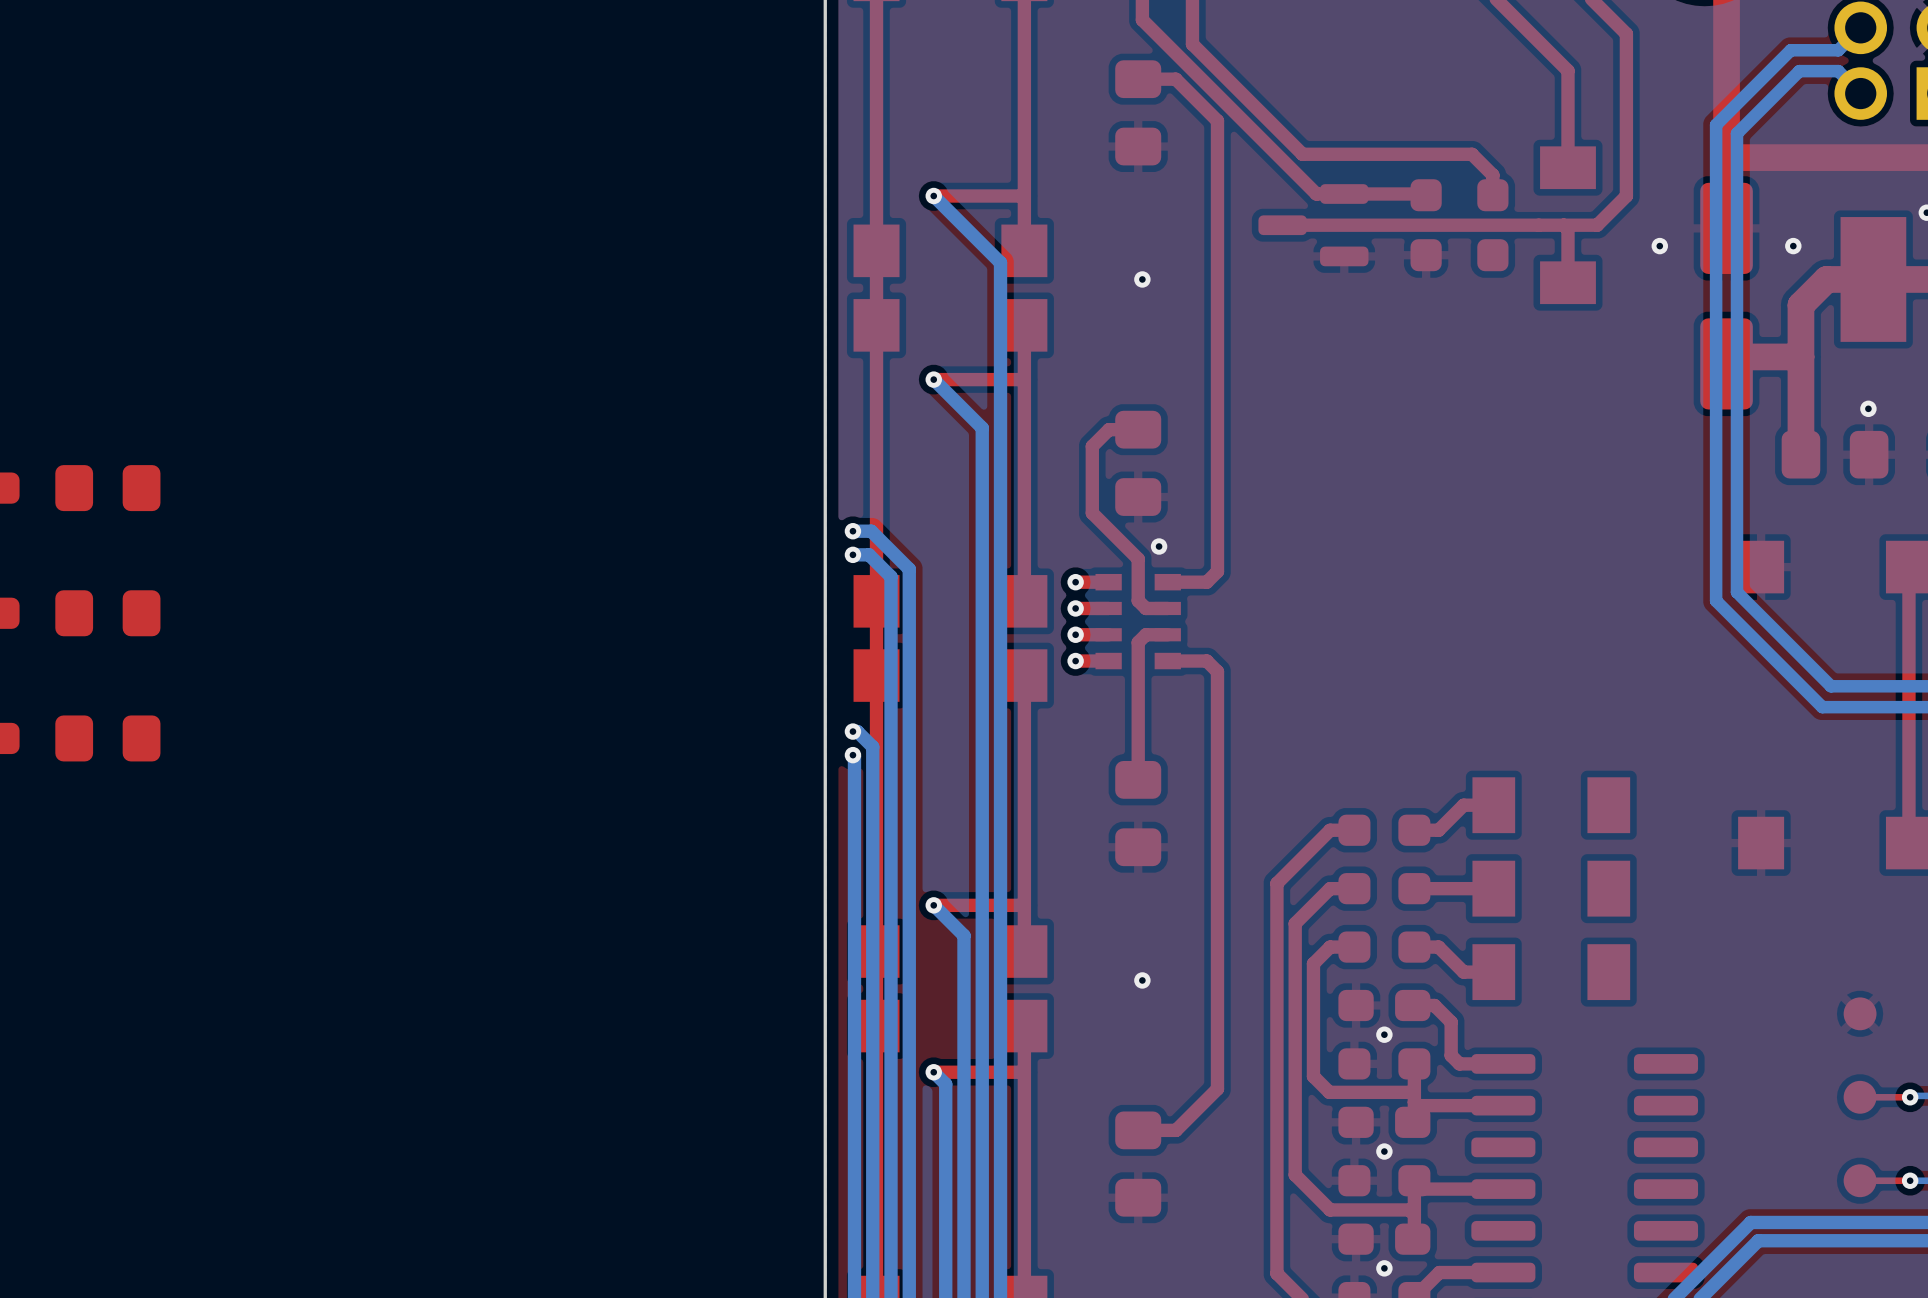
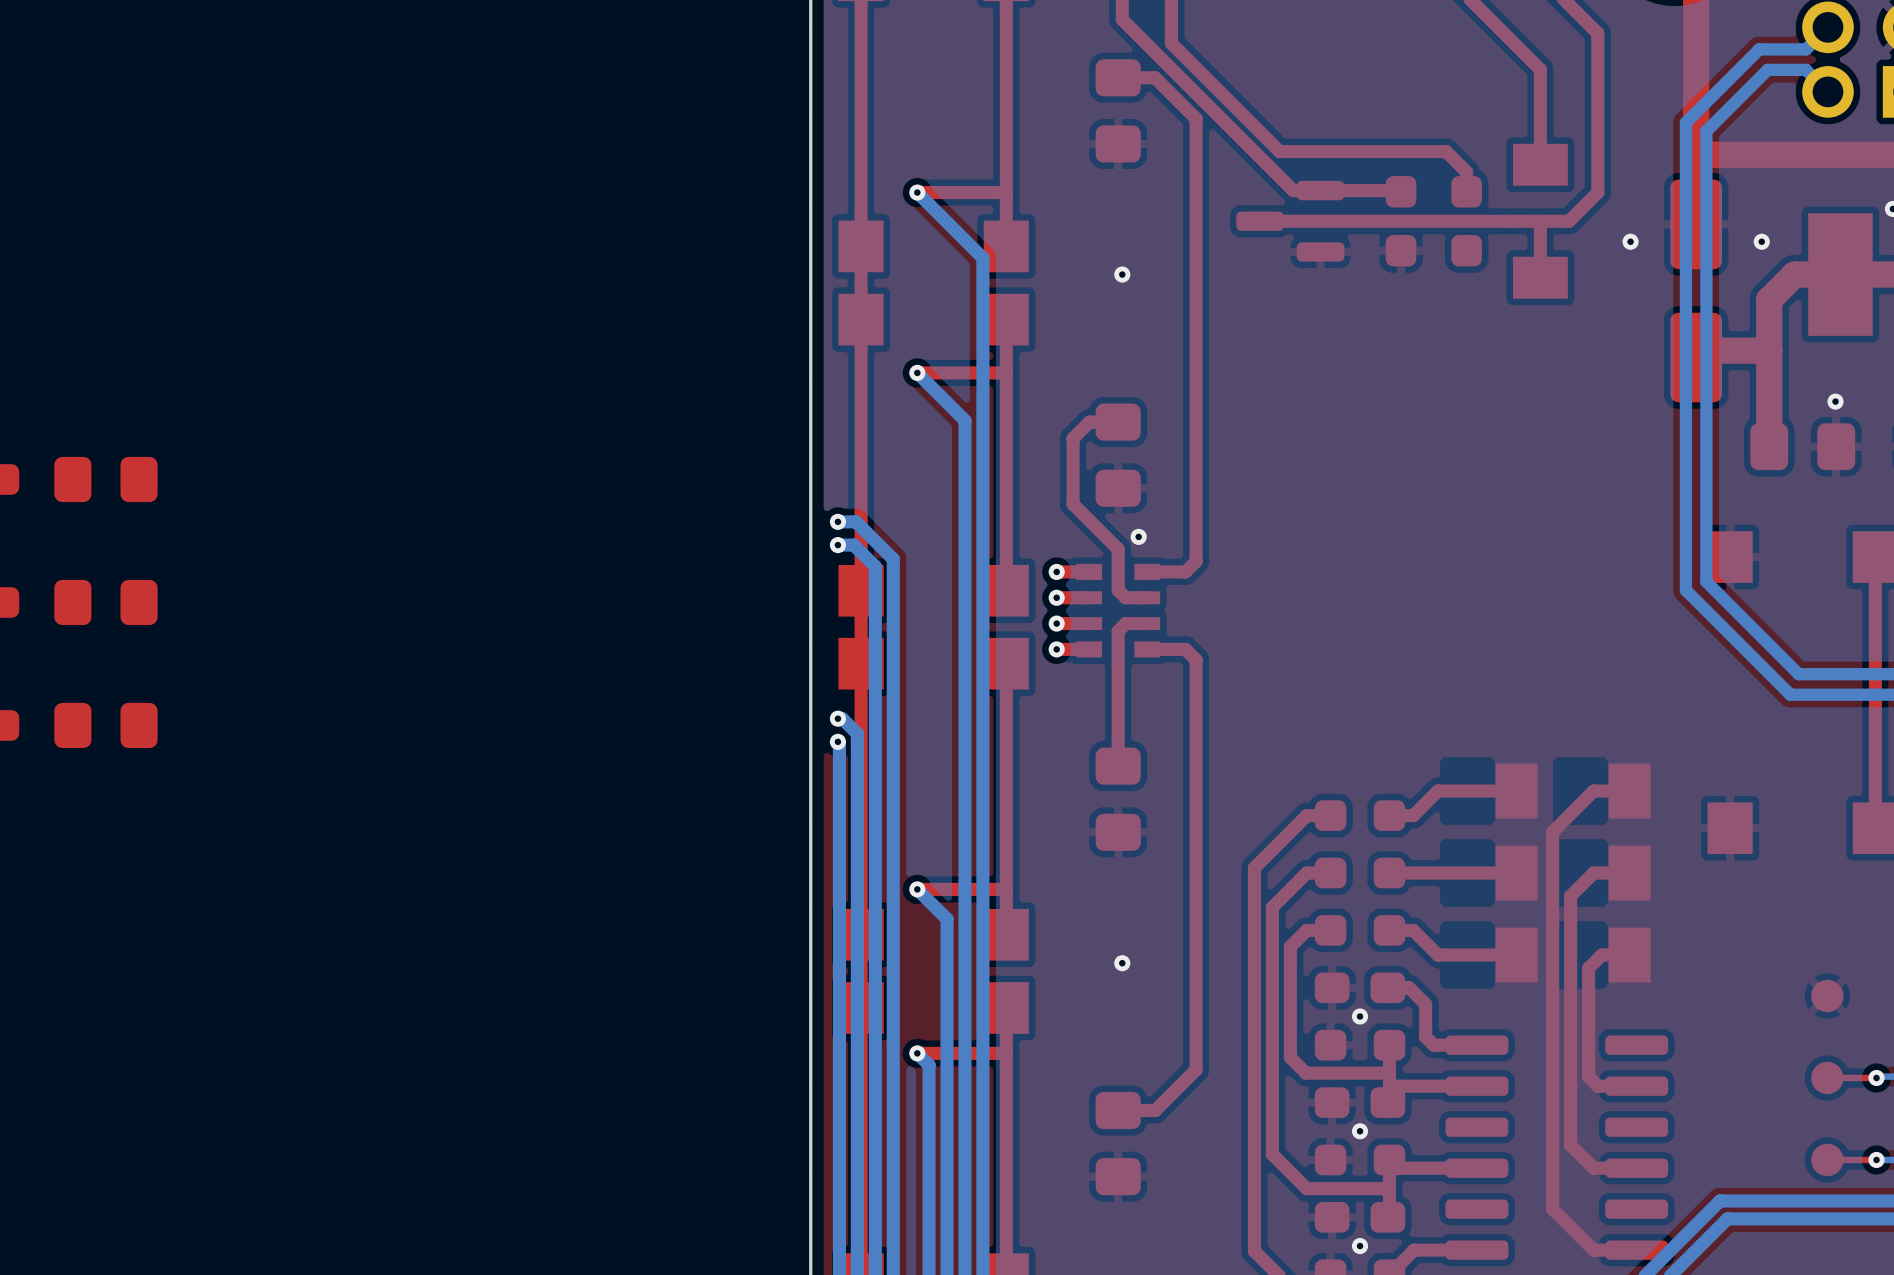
top track: none -> (1516, 791) (1467, 791)
part: (1551, 805) -> none
part: none -> (1573, 791)
top track: none -> (1629, 791) (1593, 791) (1552, 832) (1552, 1209) (1593, 1250) (1636, 1250)
top track: none -> (1516, 873) (1467, 873)
part: (1551, 888) -> none
part: none -> (1573, 873)
top track: none -> (1629, 873) (1593, 873) (1570, 896) (1570, 1145) (1593, 1168) (1636, 1168)
top track: none -> (1516, 955) (1467, 955)
part: (1551, 972) -> none
part: none -> (1573, 955)
top track: none -> (1629, 955) (1601, 955) (1588, 968) (1588, 1076) (1597, 1086) (1636, 1086)

